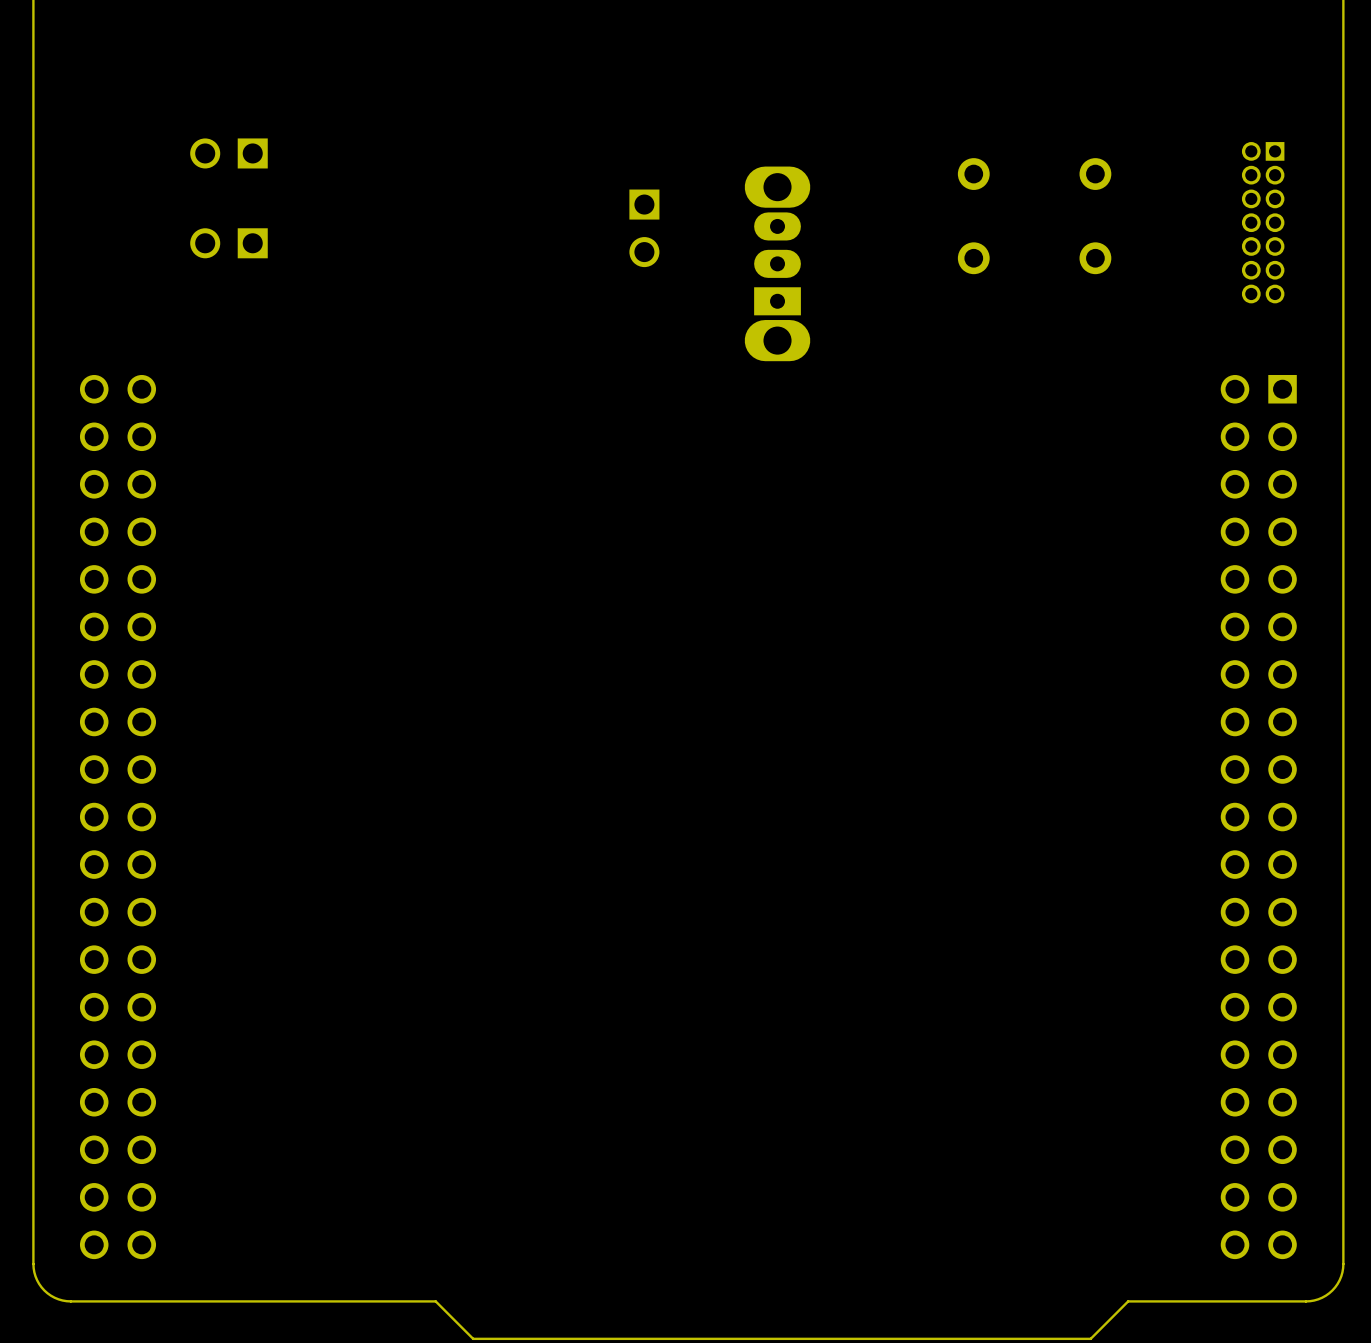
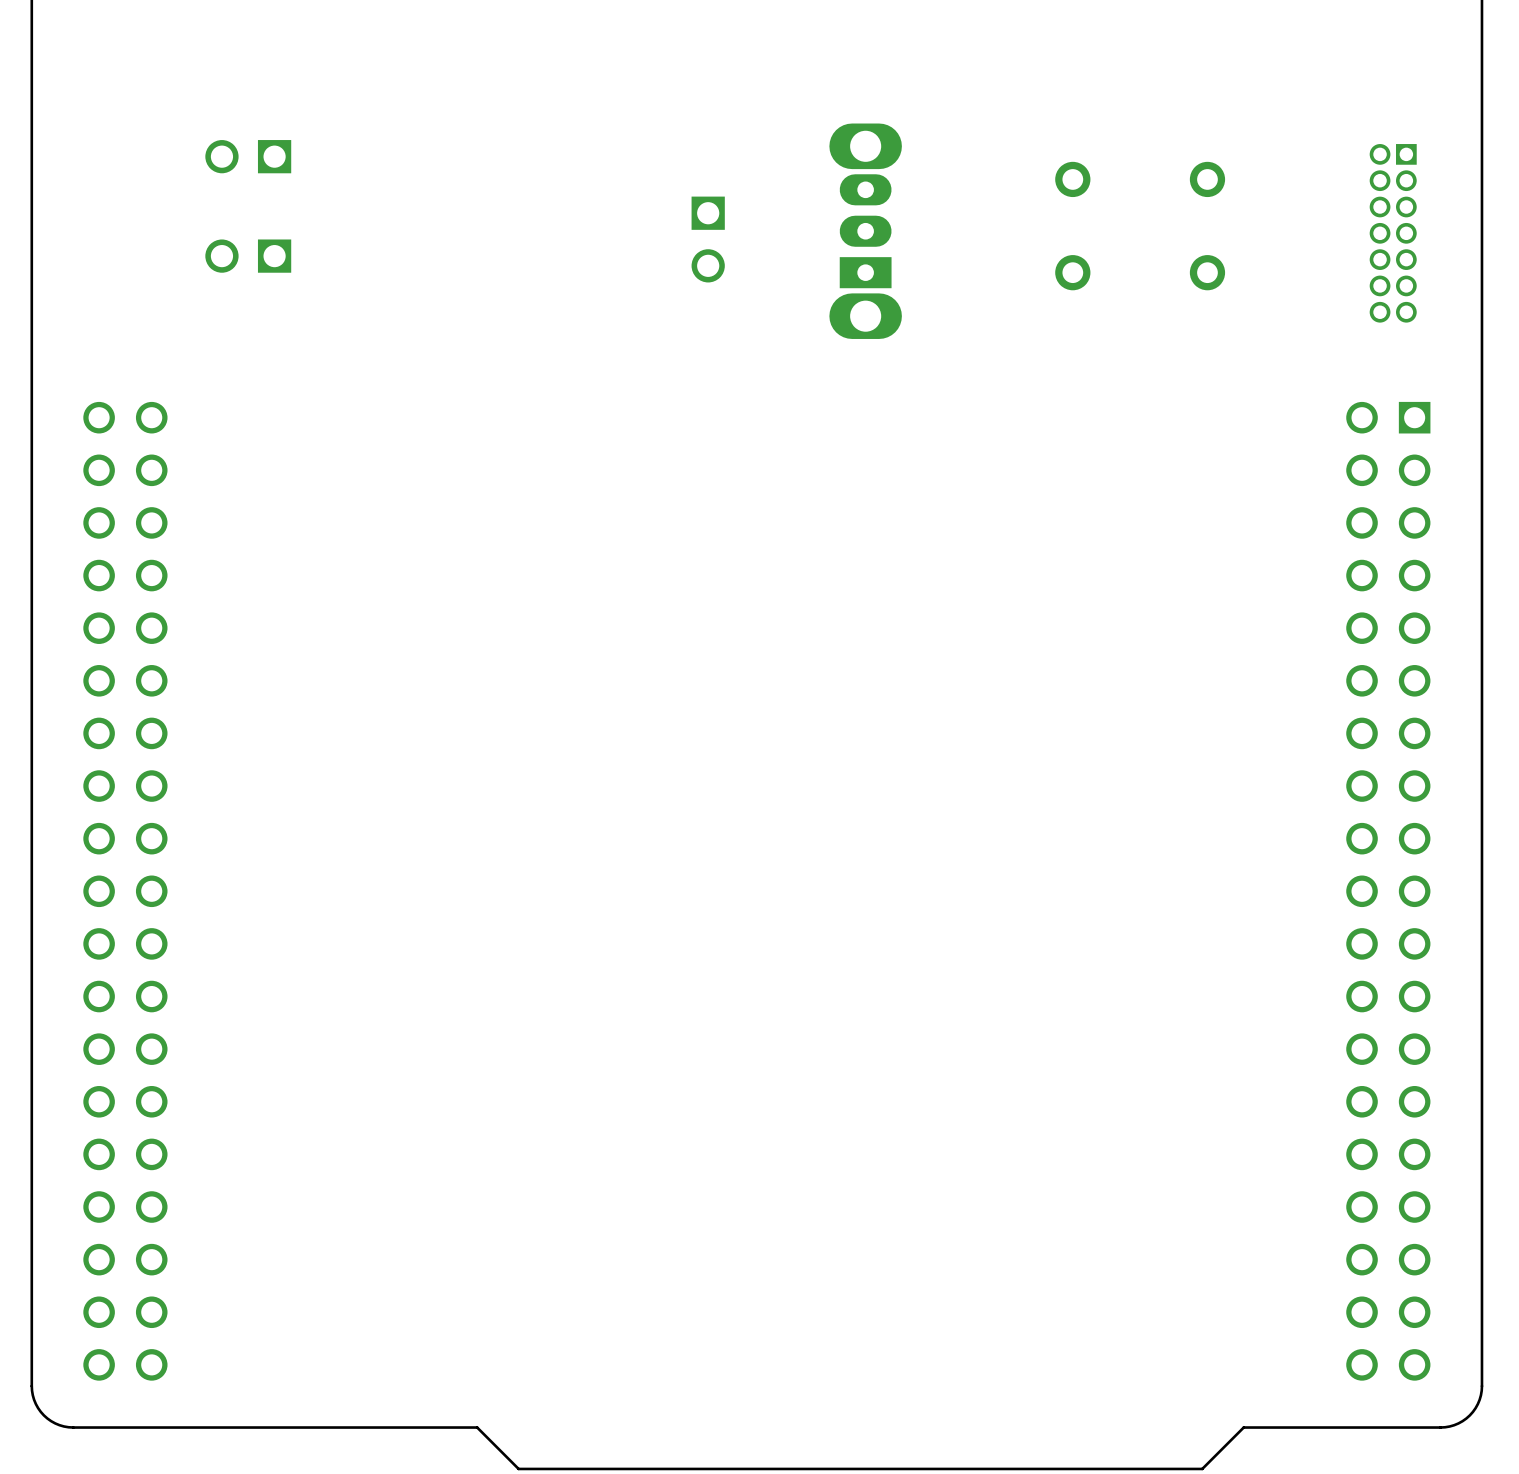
part position: (777, 263) -> (865, 231)

